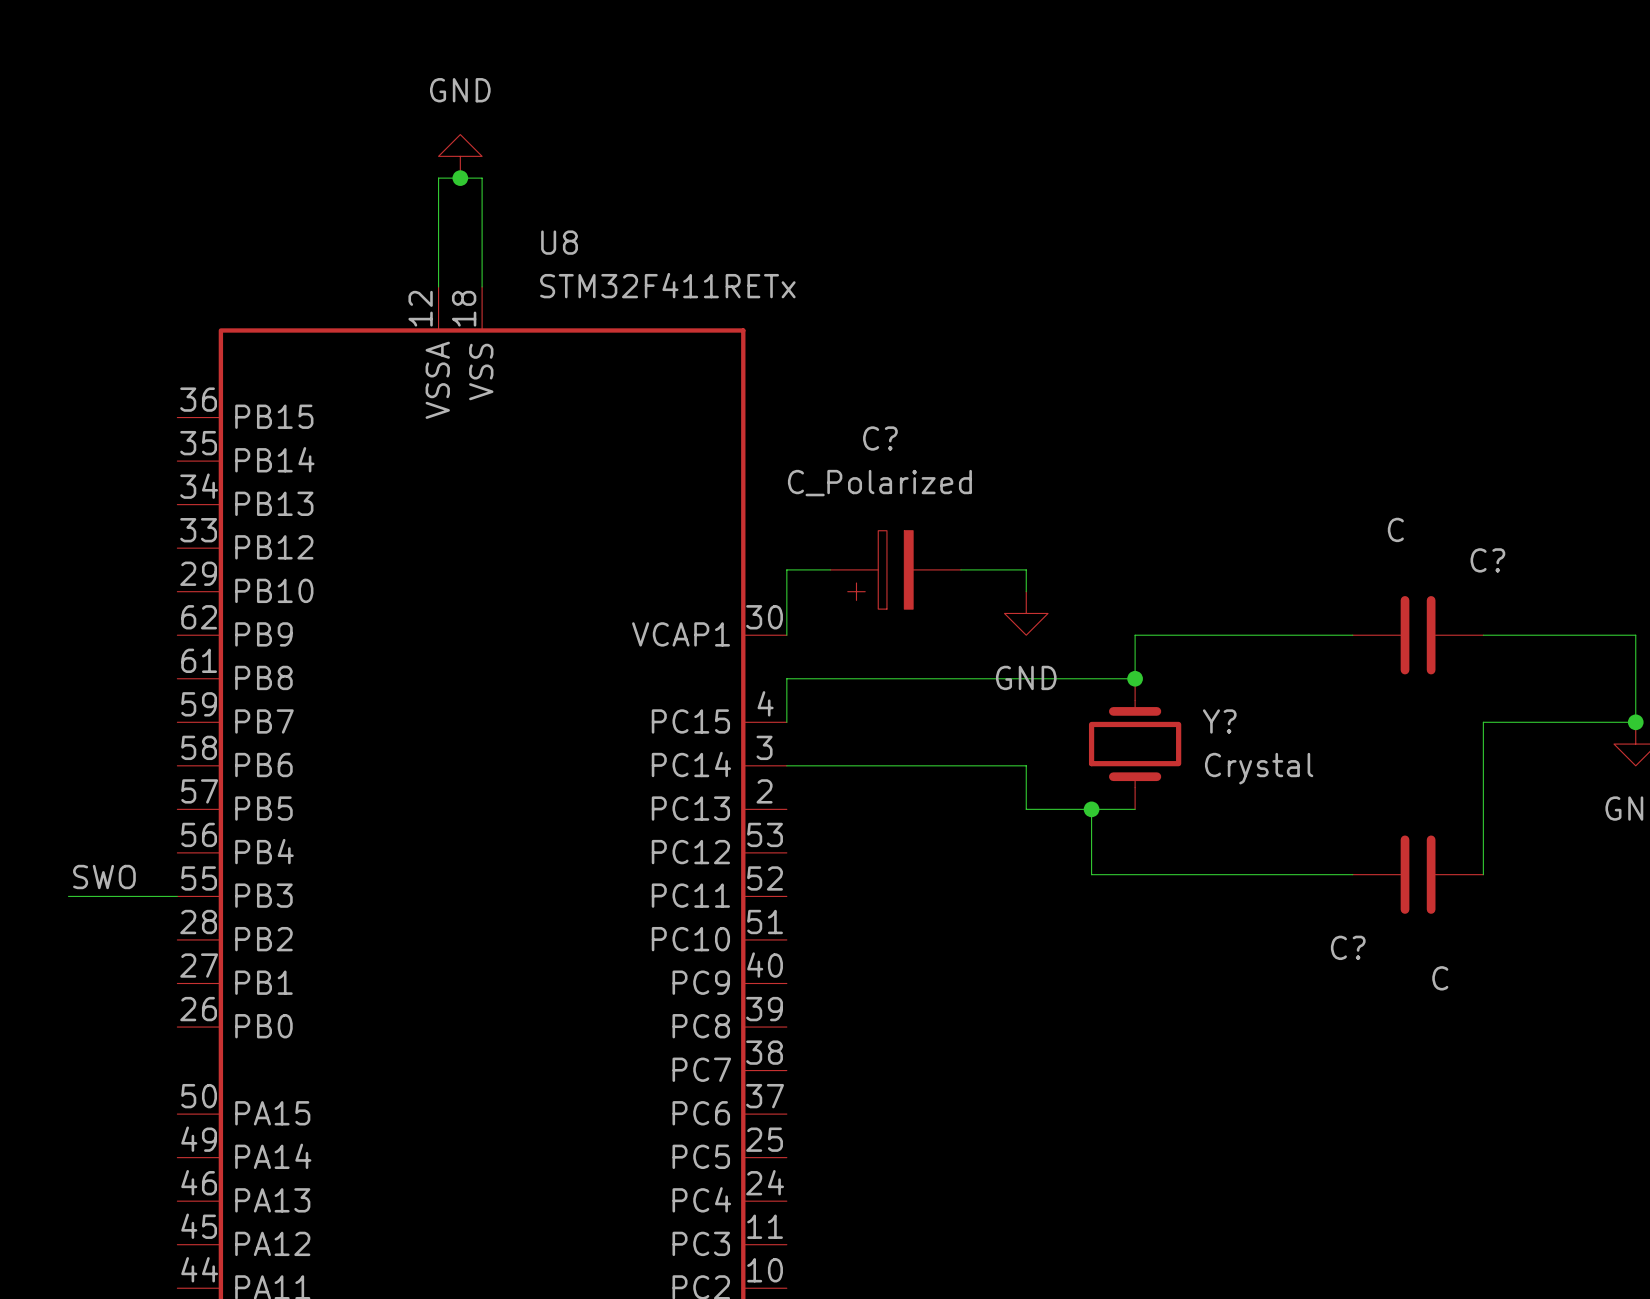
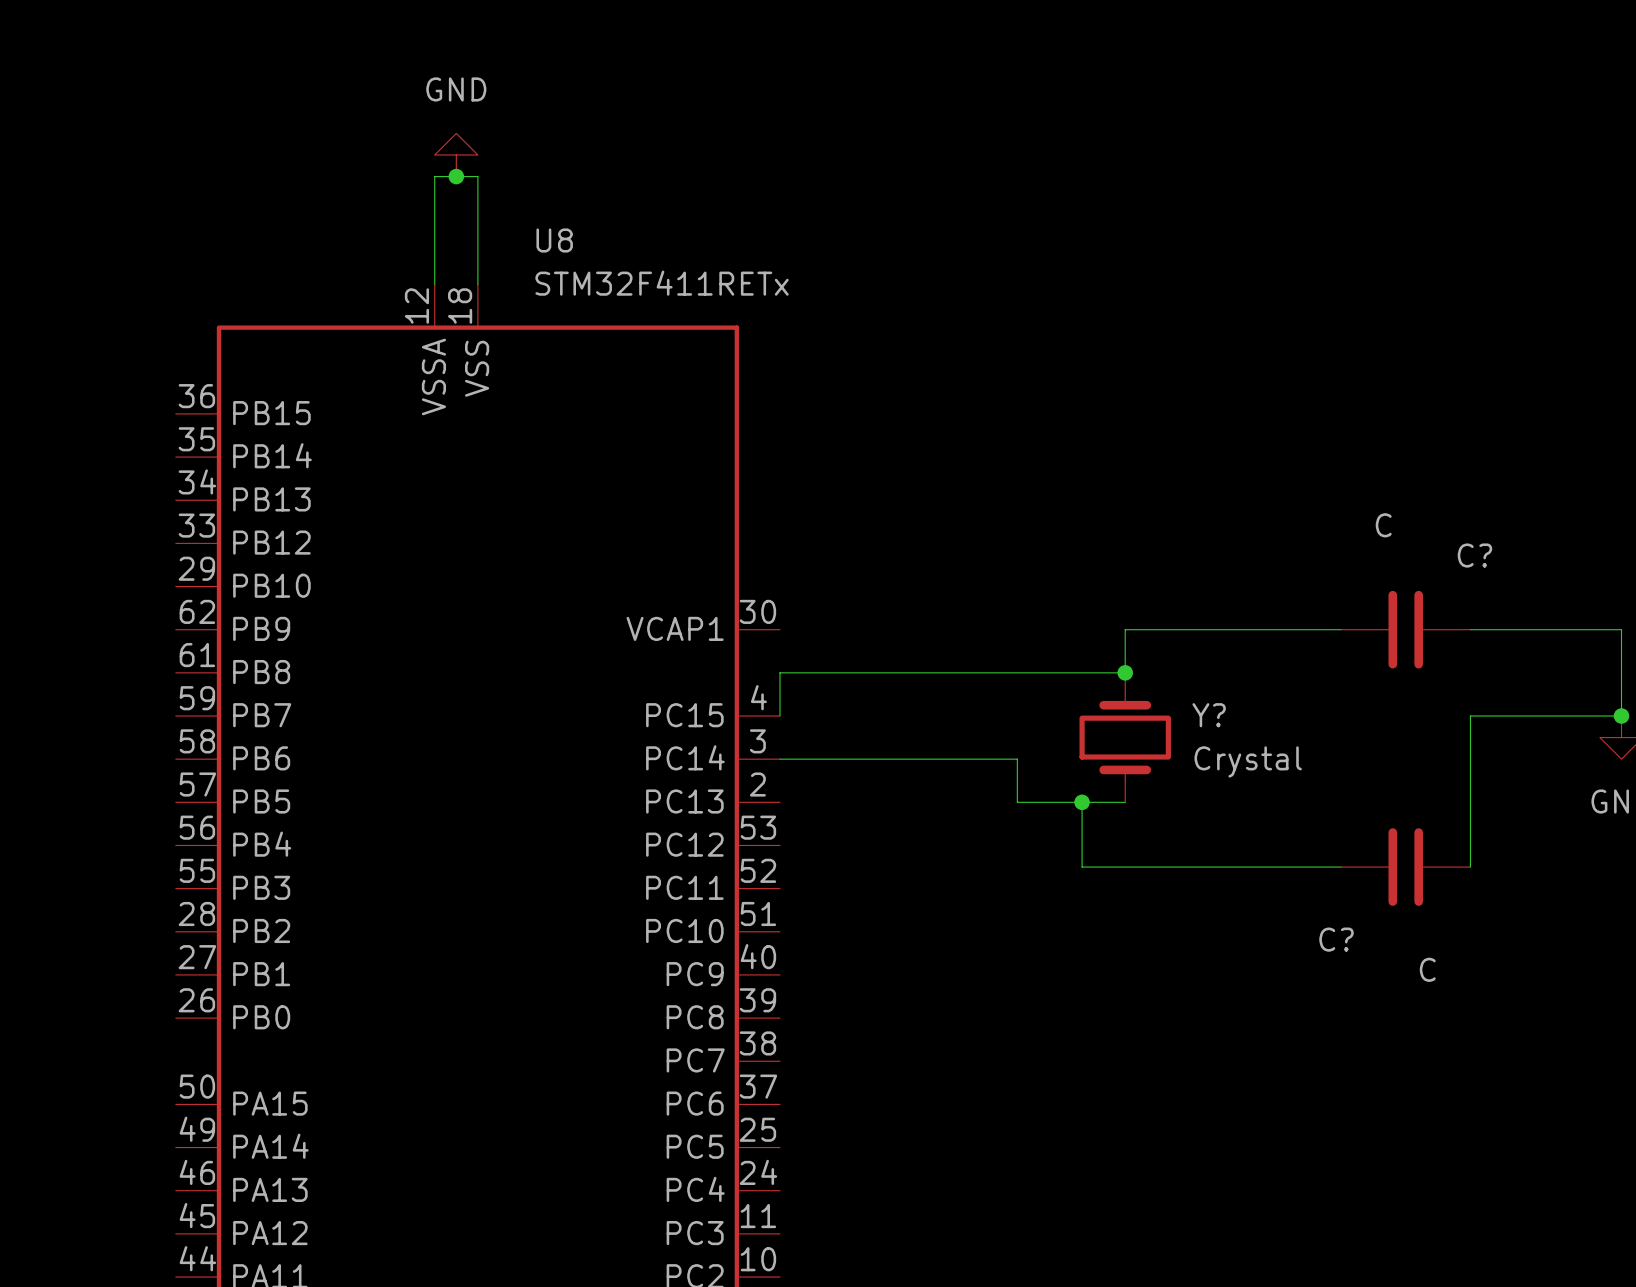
wire: (830, 569) (786, 569) (786, 635) -> none
C?: C_Polarized (895, 569) -> none
wire: (960, 569) (1026, 569) (1026, 591) -> none
power symbol: GND (1026, 613) -> none
label: SWO (104, 877) -> none
wire: (68, 896) (177, 896) -> none

